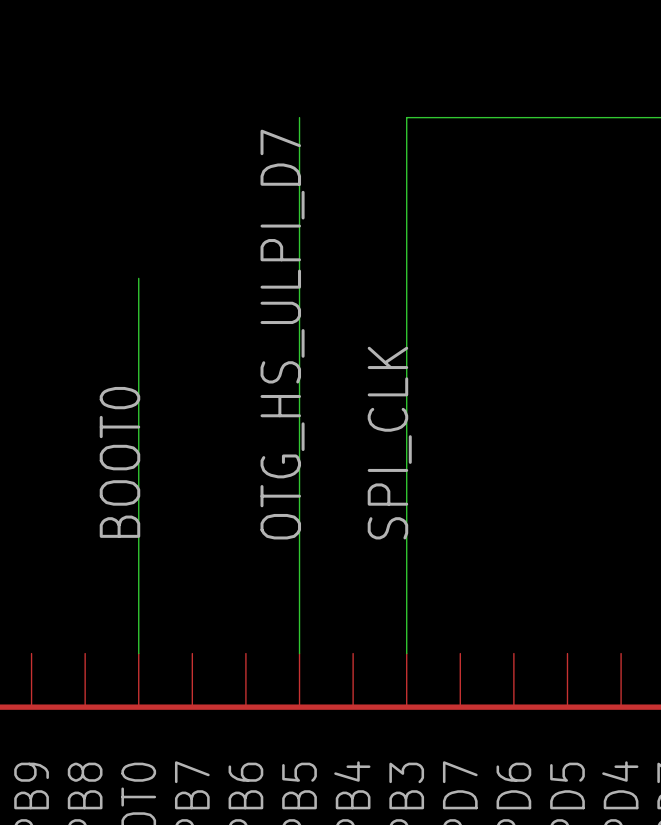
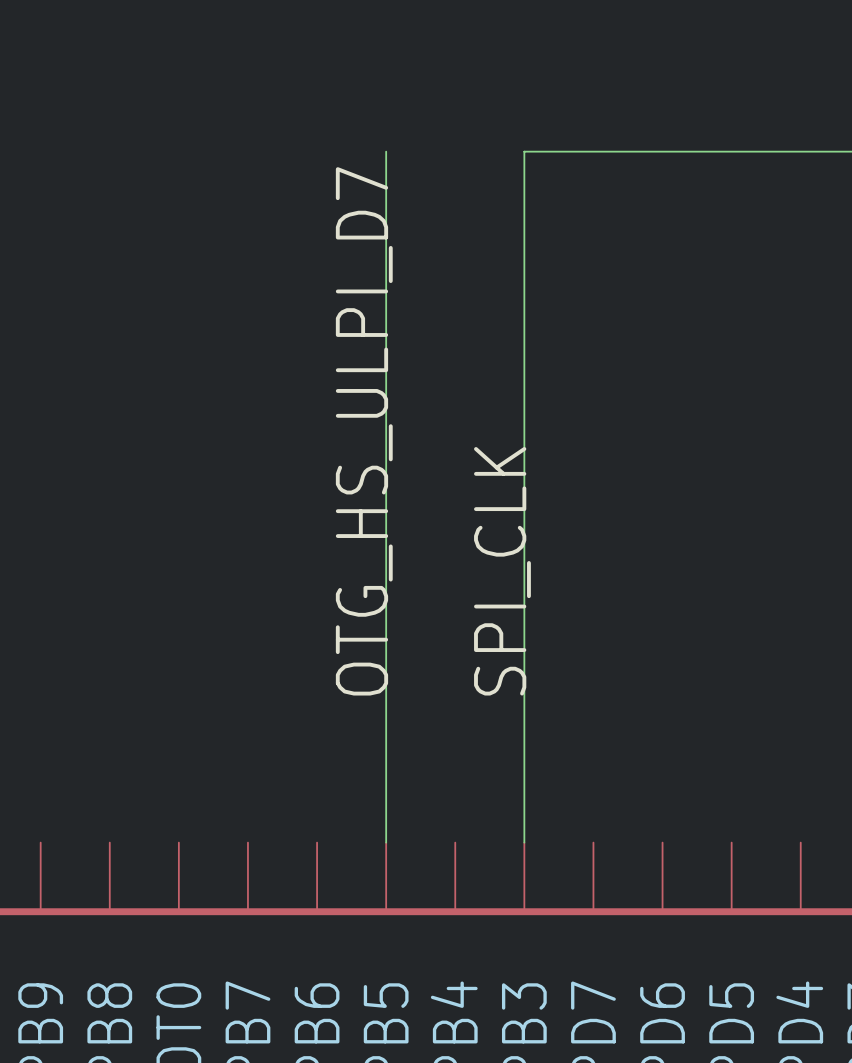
wire: (138, 278) (138, 653) -> none
label: BOOT0 (119, 462) -> none

